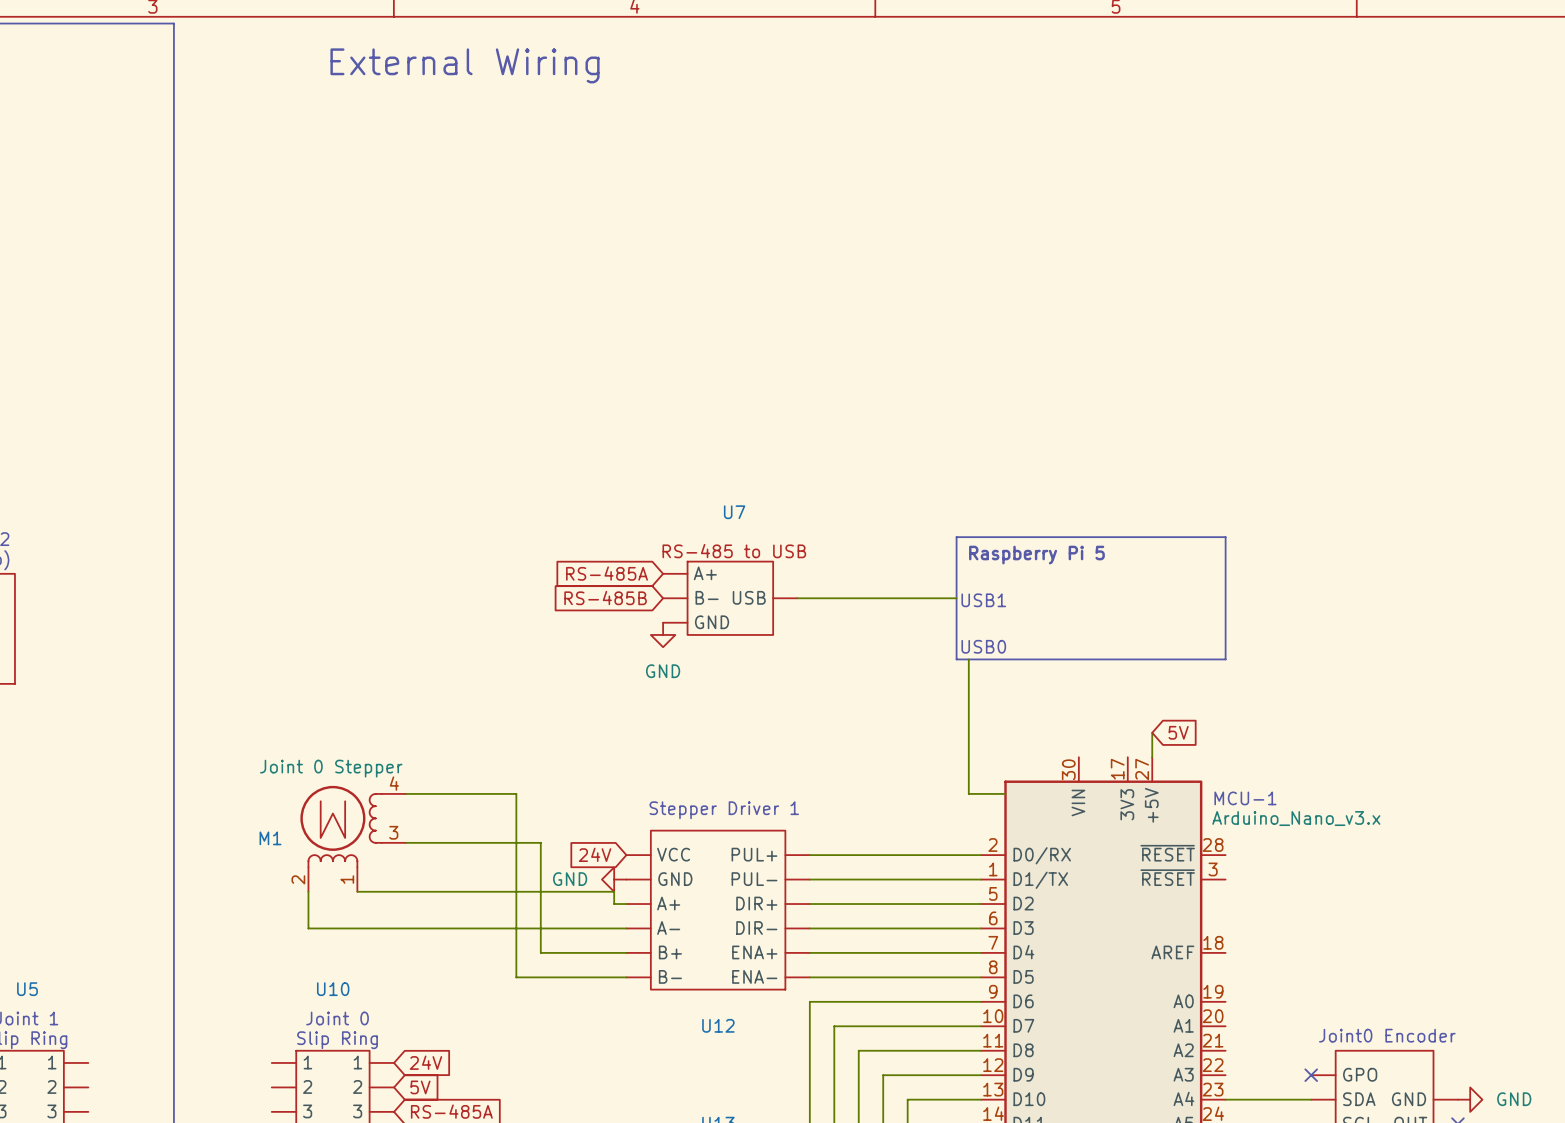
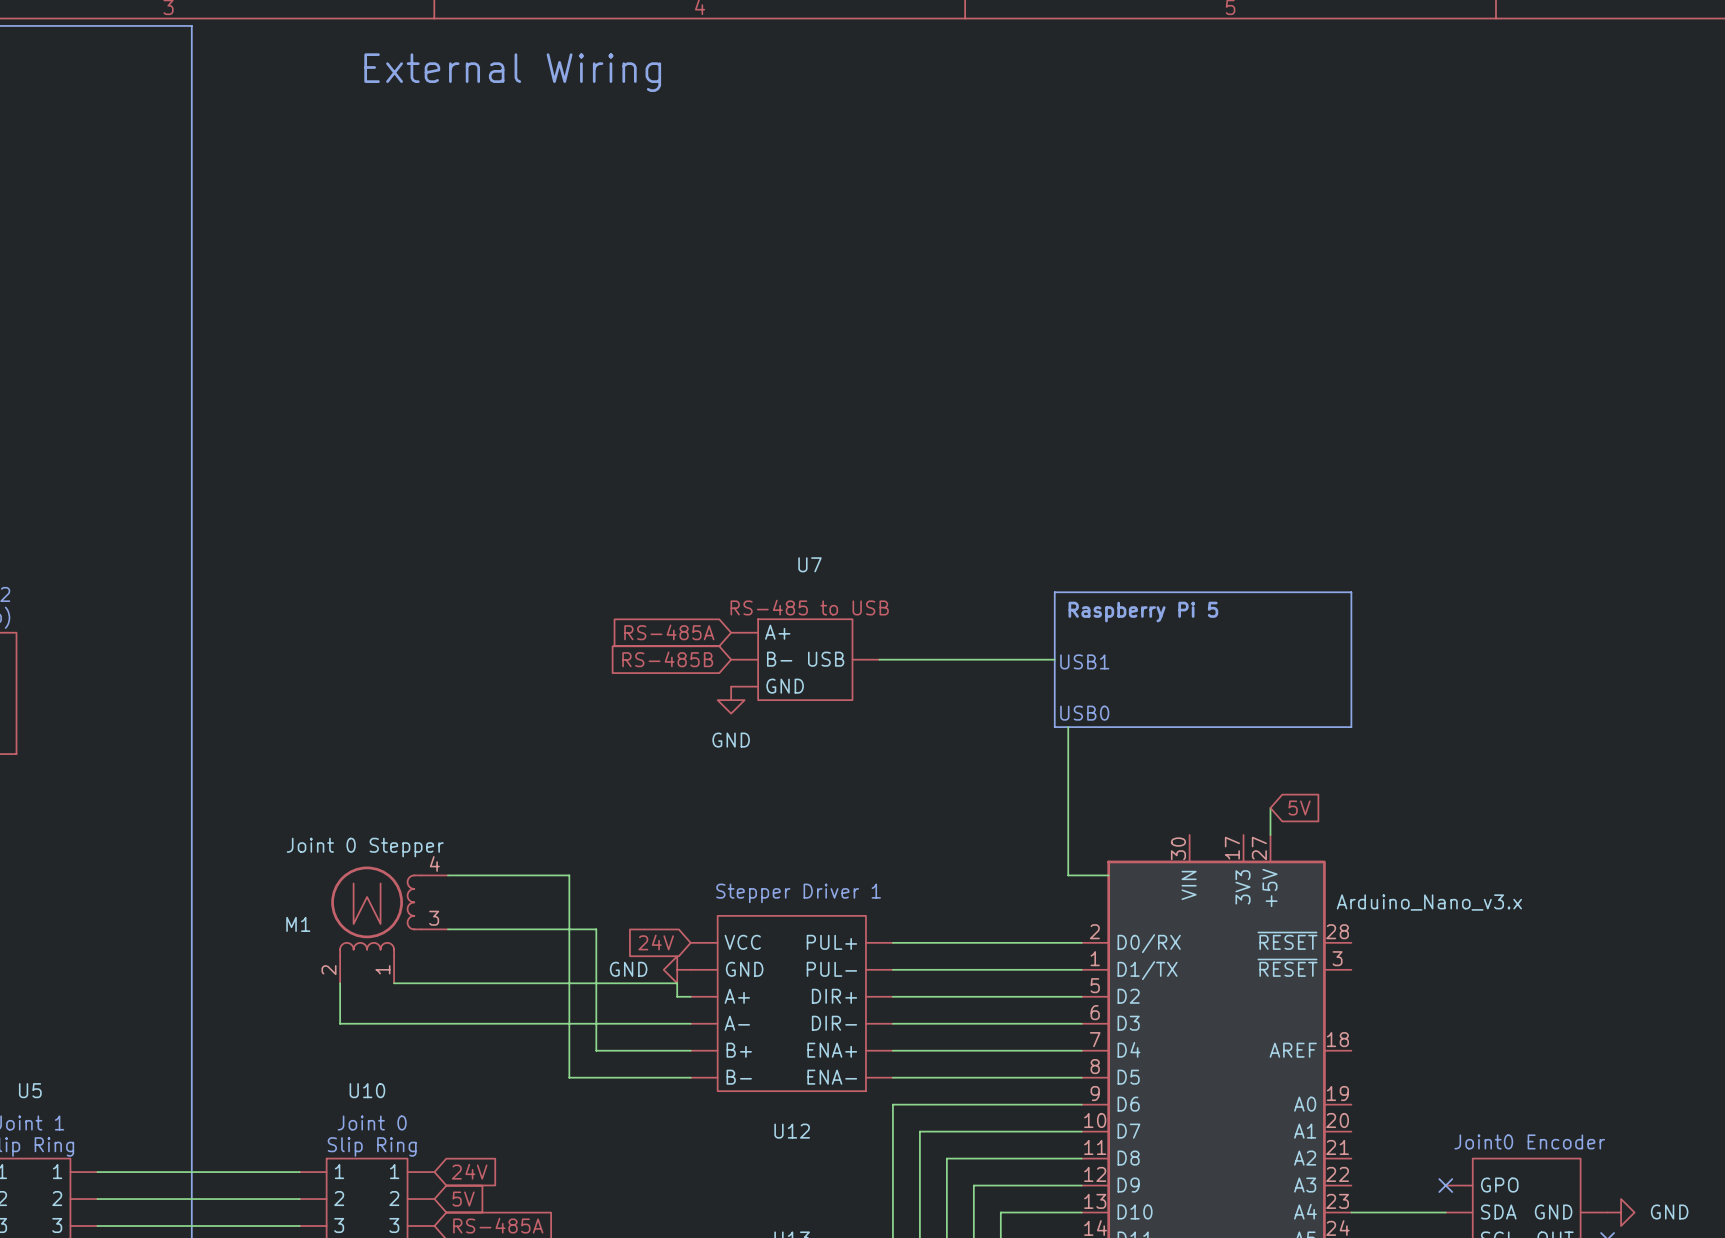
text: MCU-1 (1245, 798) -> none
wire: none -> (97, 1172) (299, 1172)
wire: none -> (97, 1199) (299, 1199)
wire: none -> (97, 1226) (299, 1226)

